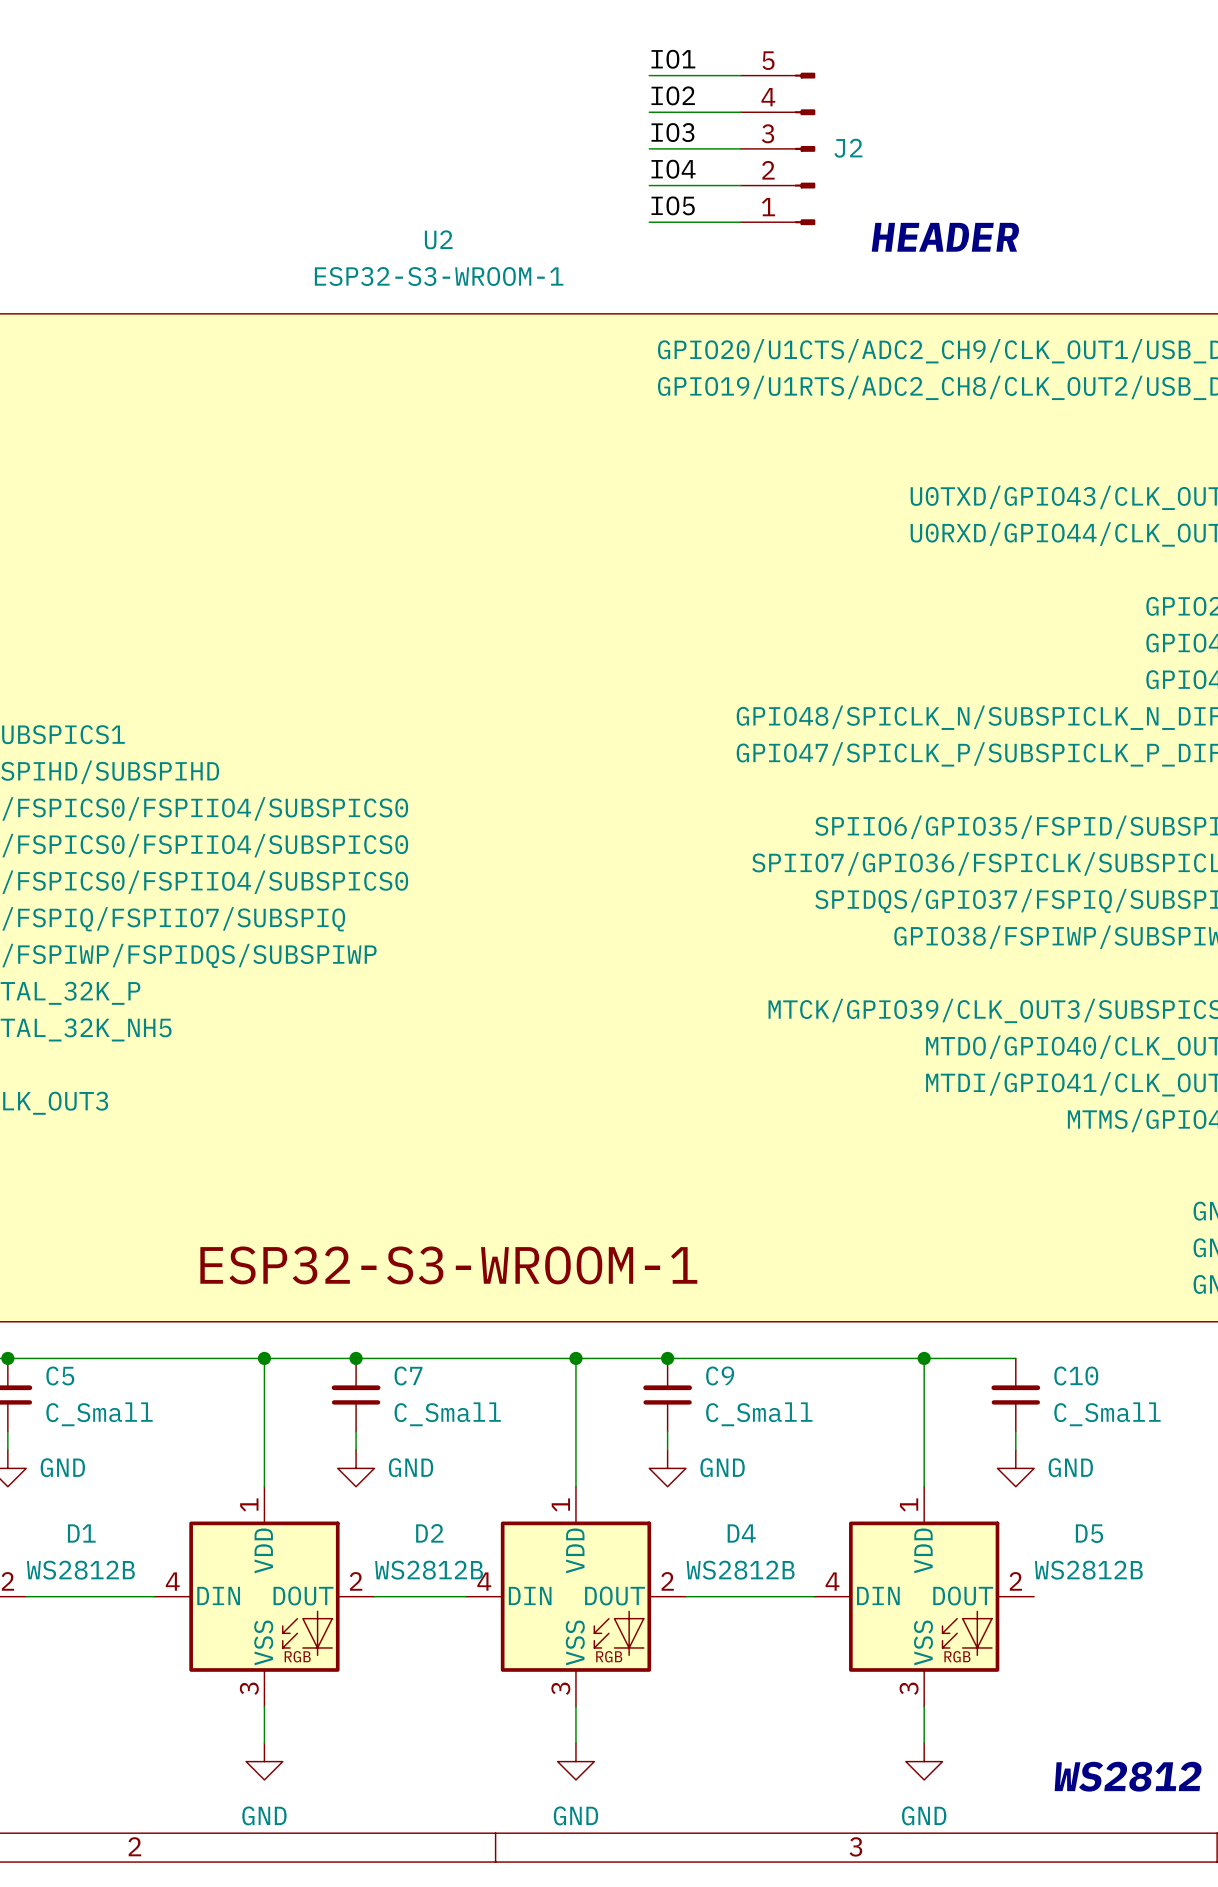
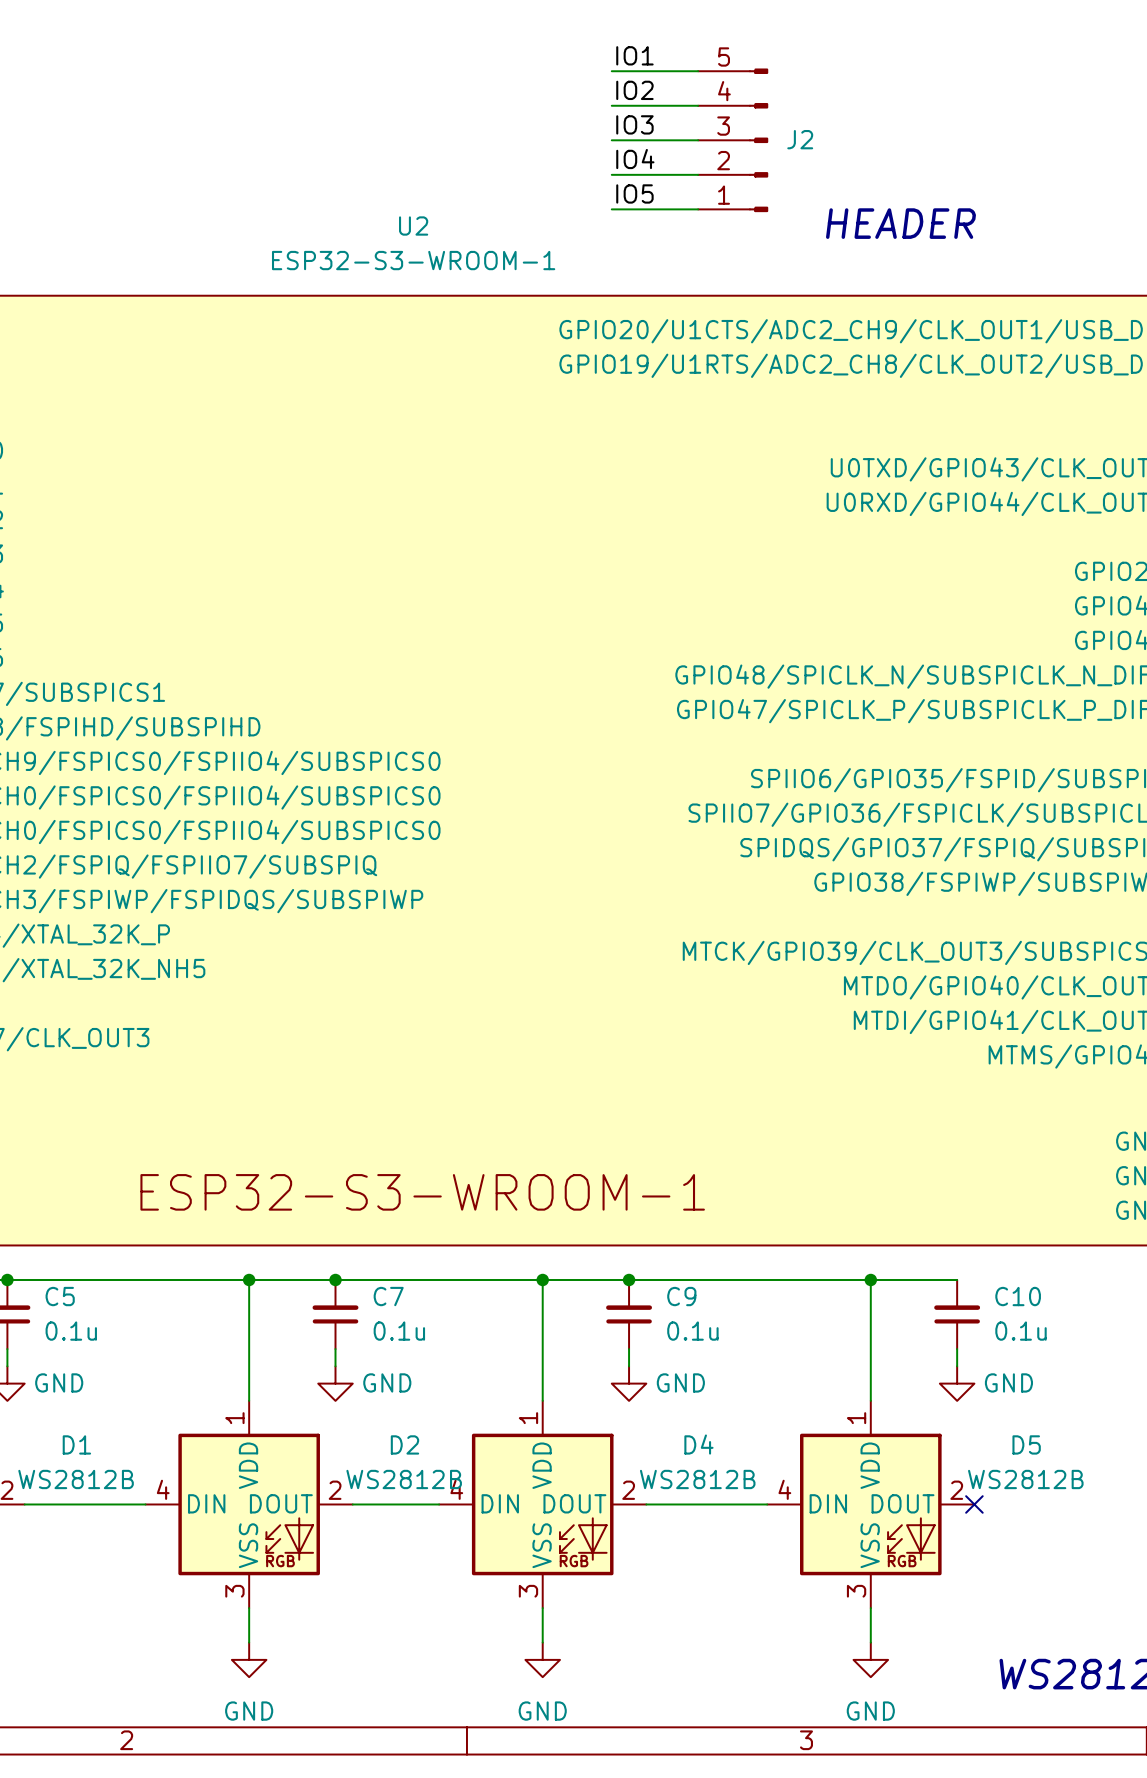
C5 value: C_Small (99, 1414) -> 0.1u (71, 1331)
C7 value: C_Small (447, 1414) -> 0.1u (399, 1331)
C9 value: C_Small (759, 1414) -> 0.1u (692, 1331)
C10 value: C_Small (1107, 1414) -> 0.1u (1021, 1331)
no-connect mark: none -> (974, 1504)

